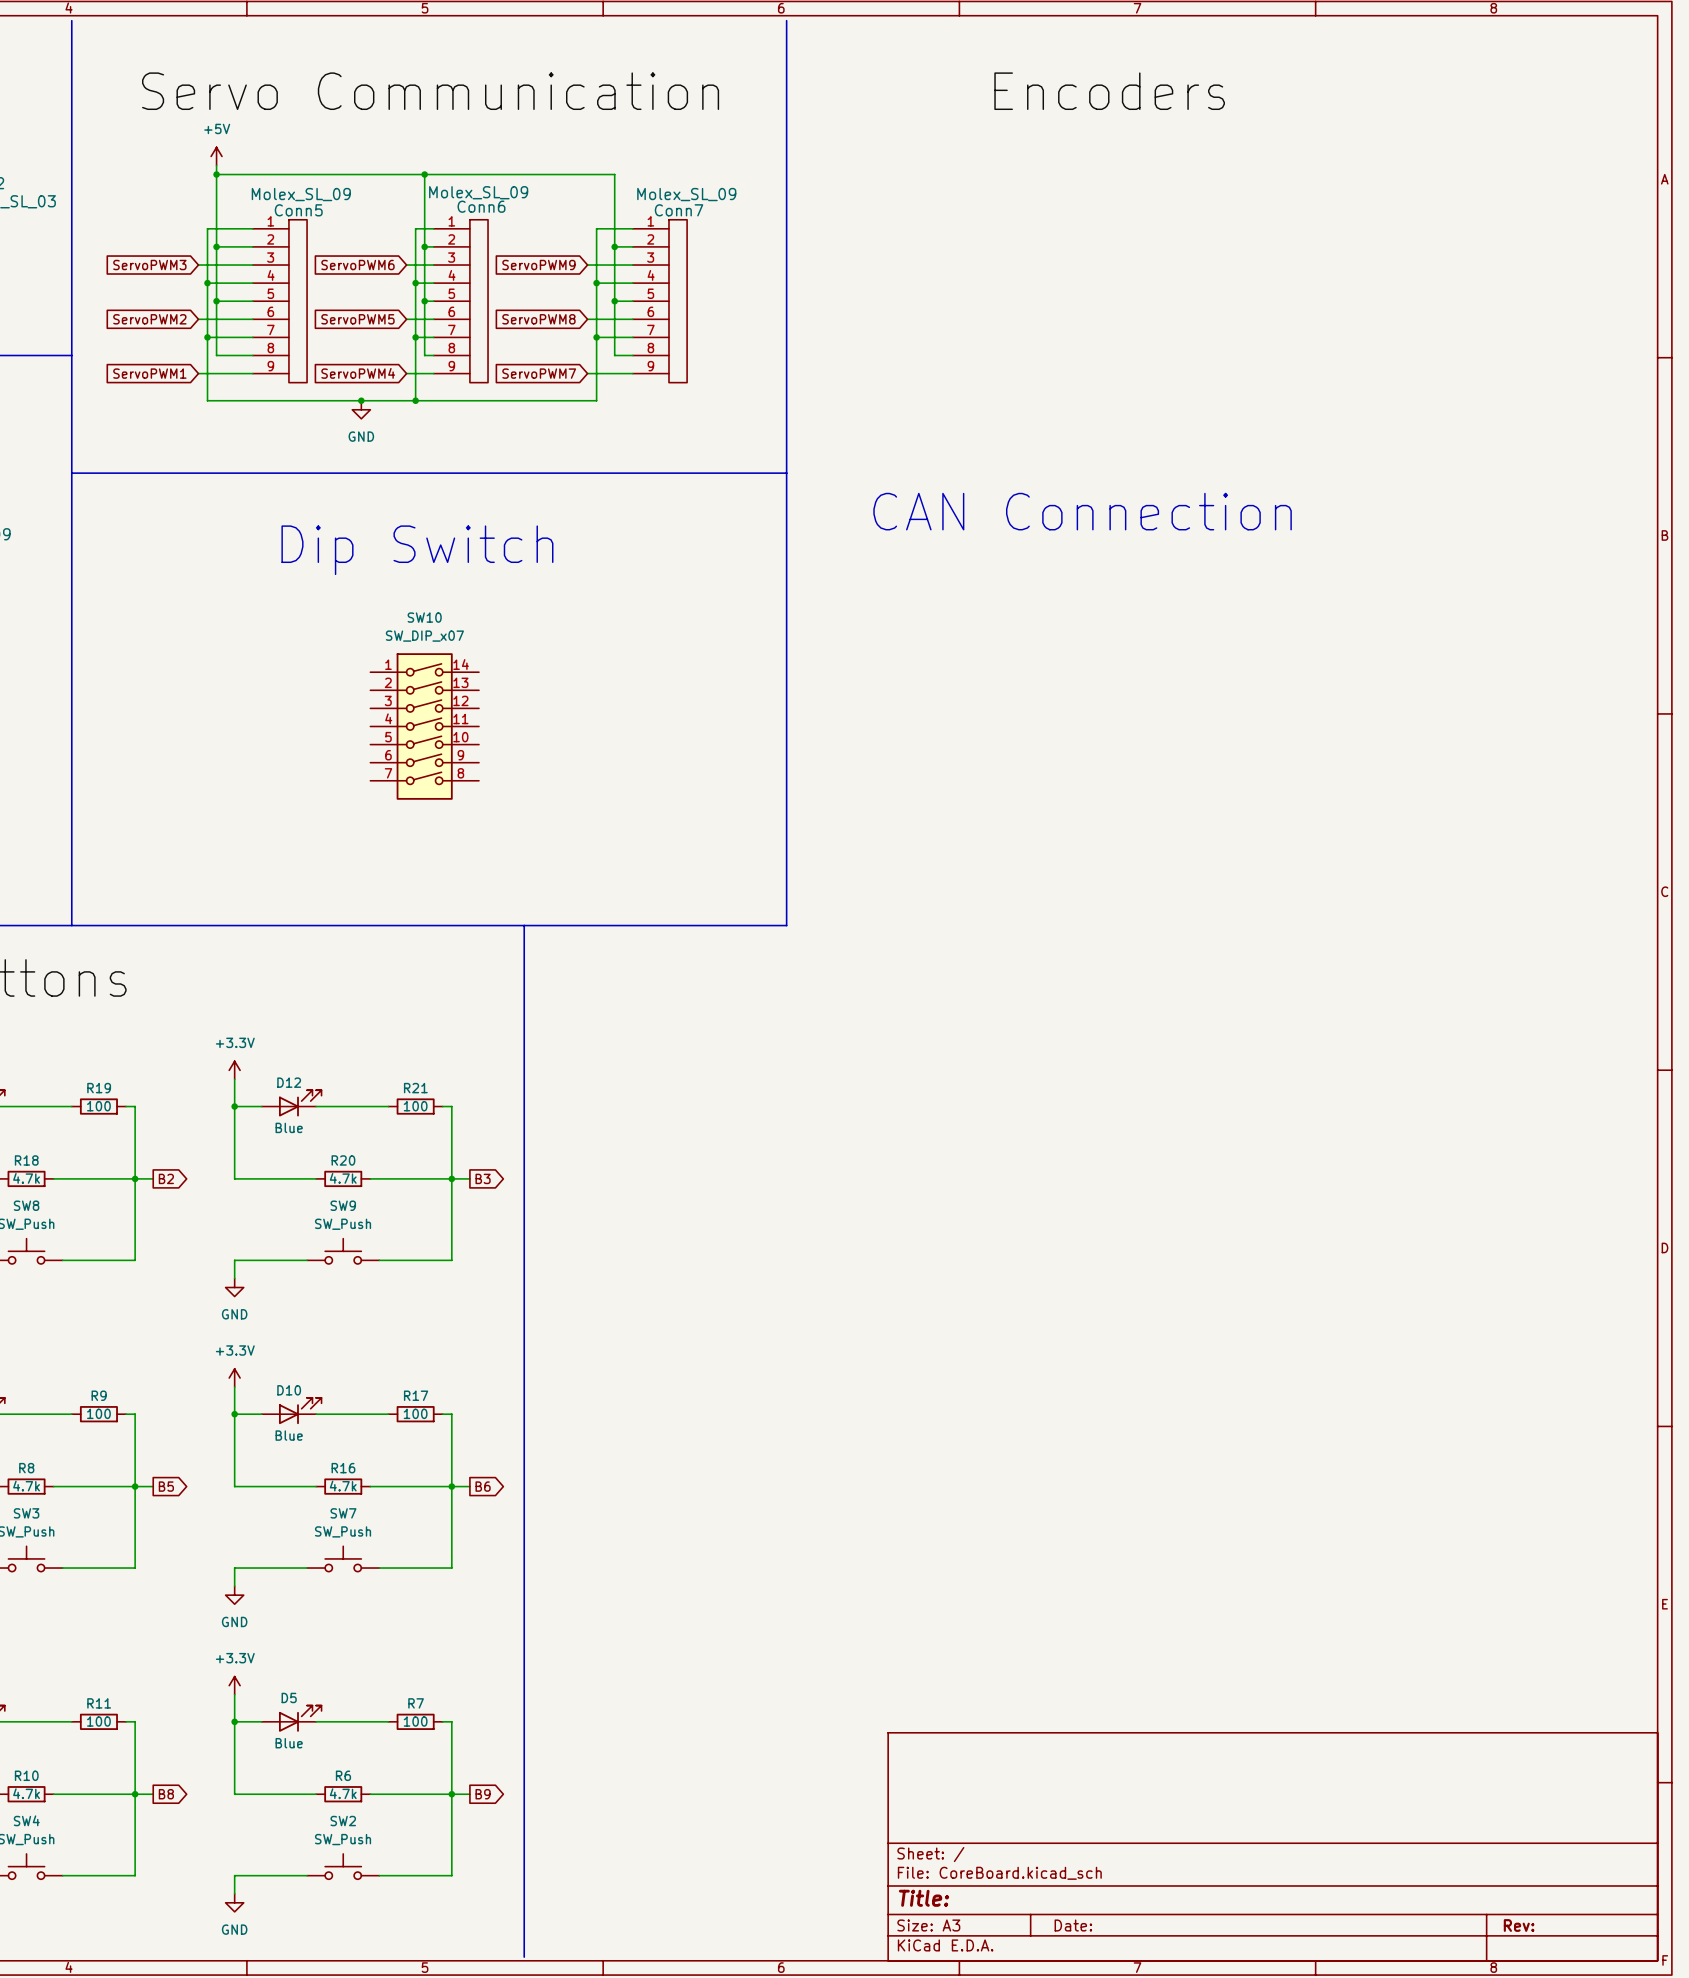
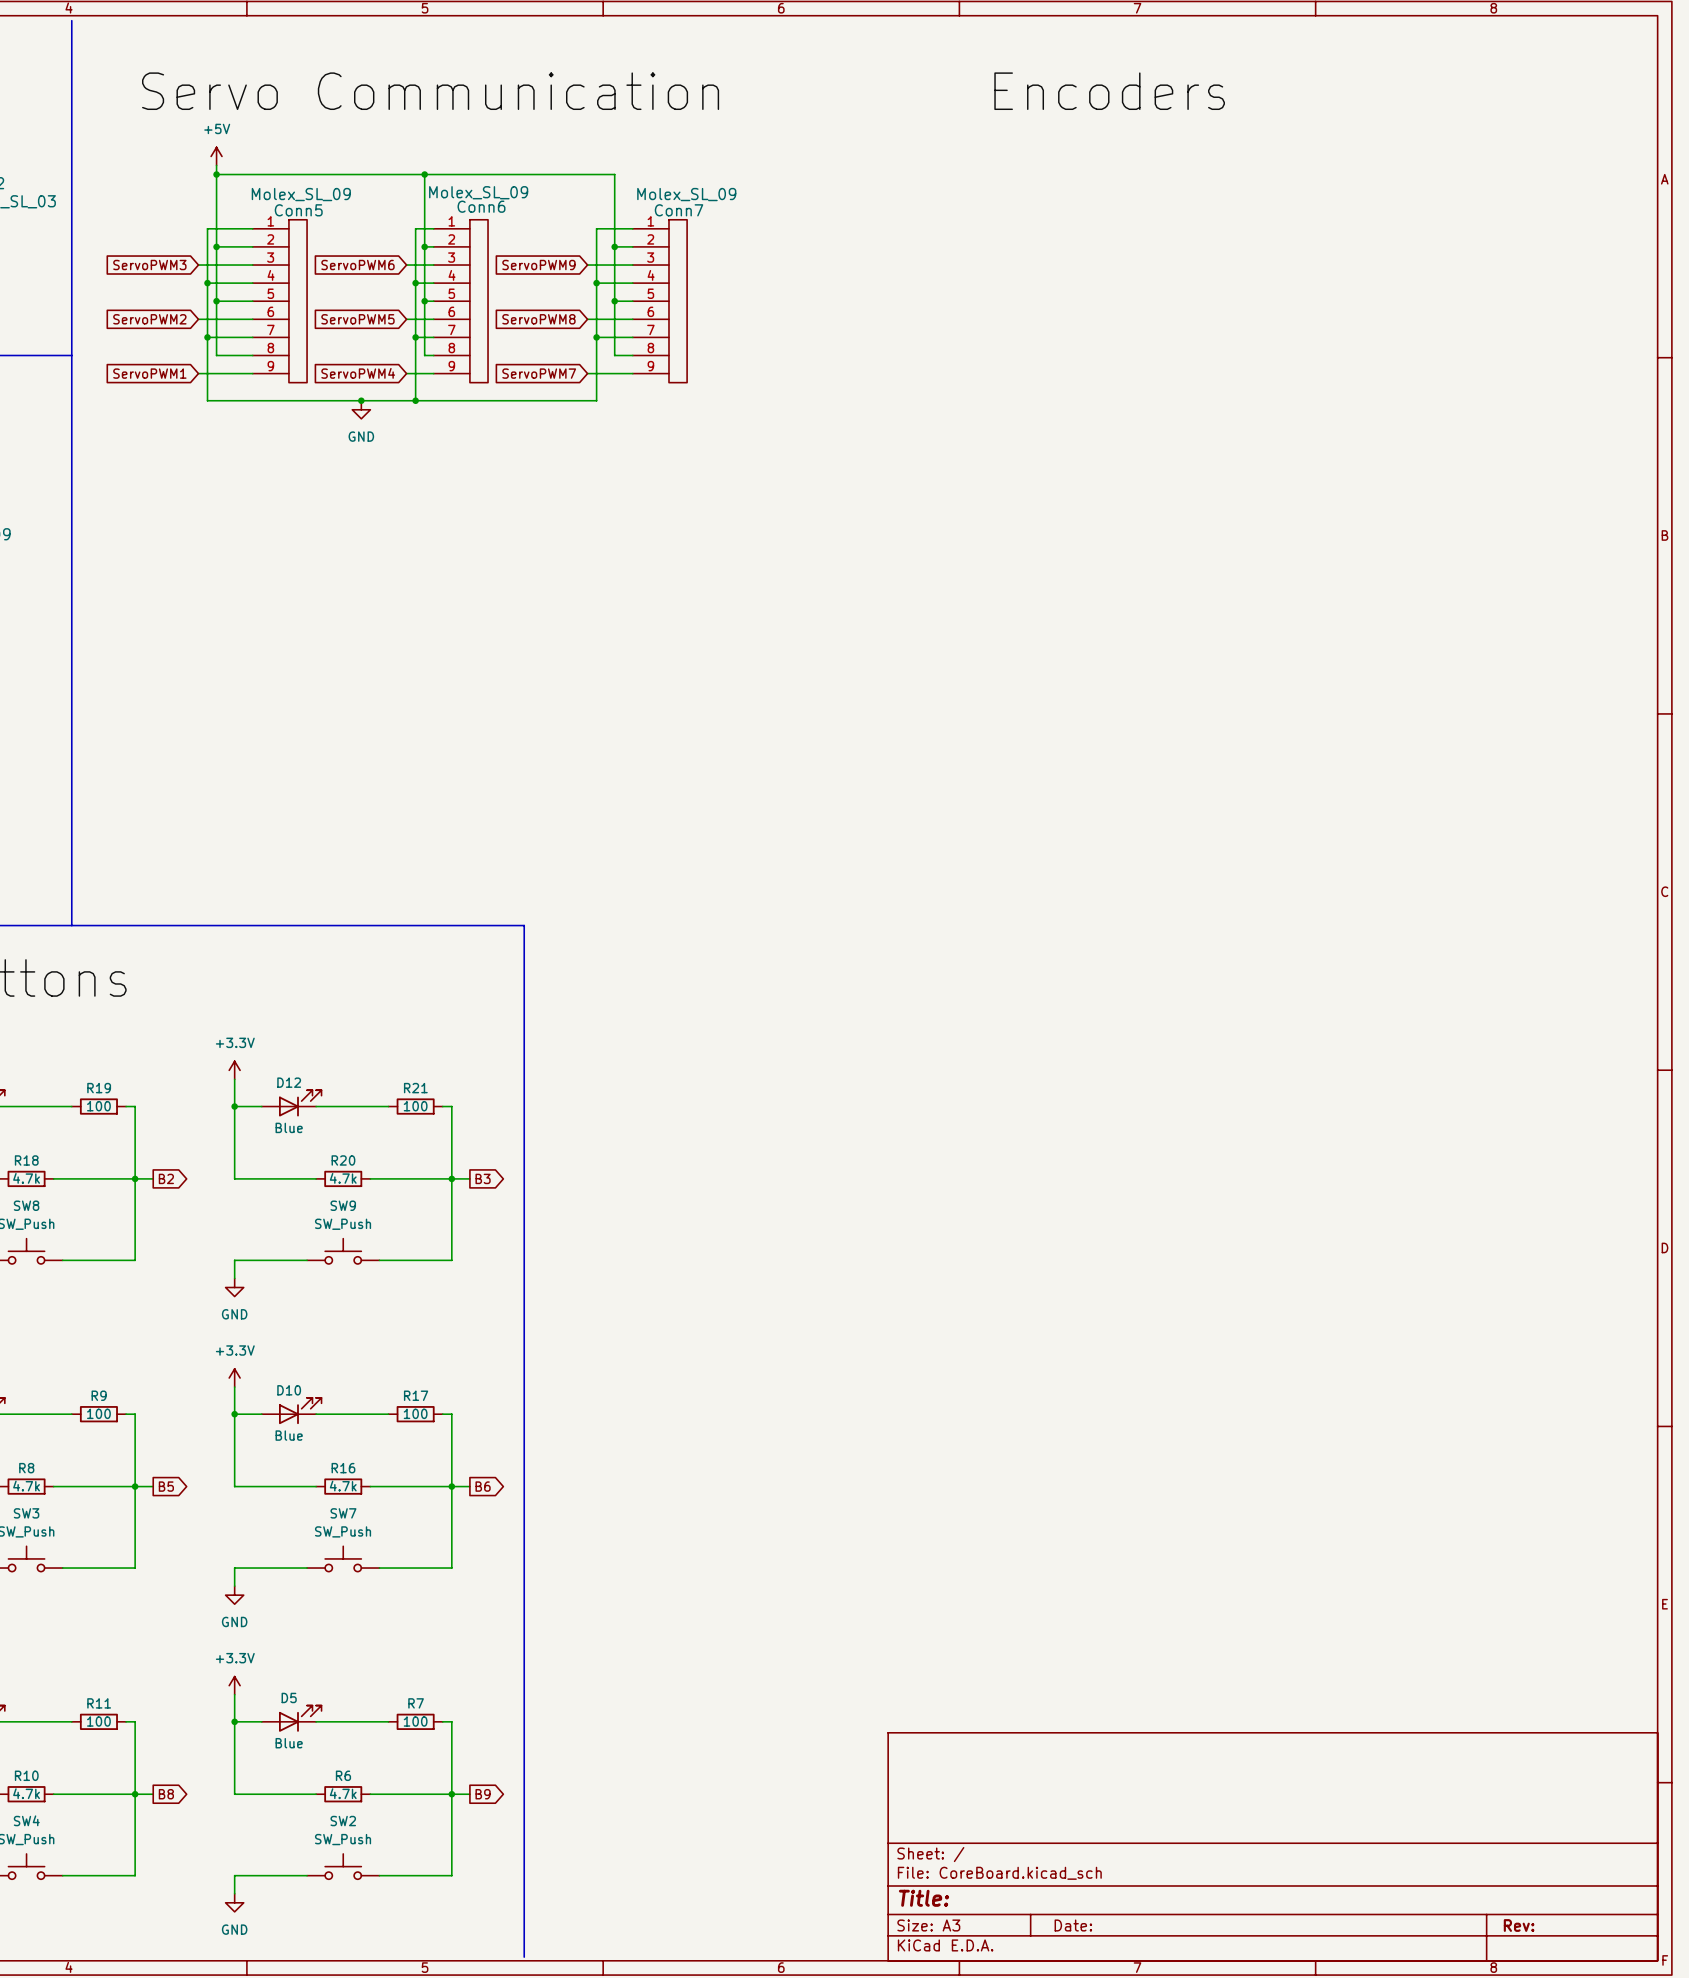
line: (786, 20) (786, 925) (524, 925) -> none
line: (71, 473) (786, 473) -> none
text: CAN Connection (1082, 511) -> none
text: Dip Switch (417, 550) -> none
SW10: SW_DIP_x07 (424, 726) -> none

